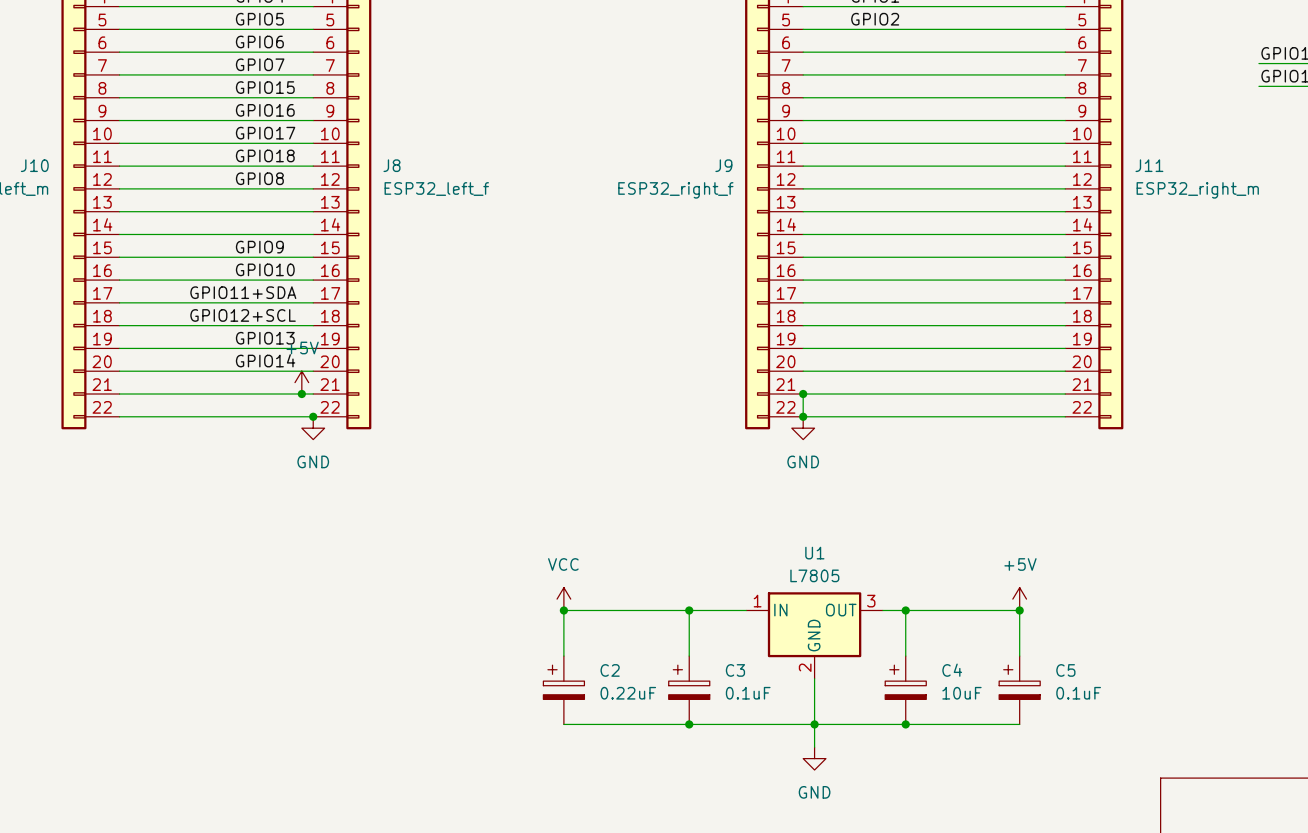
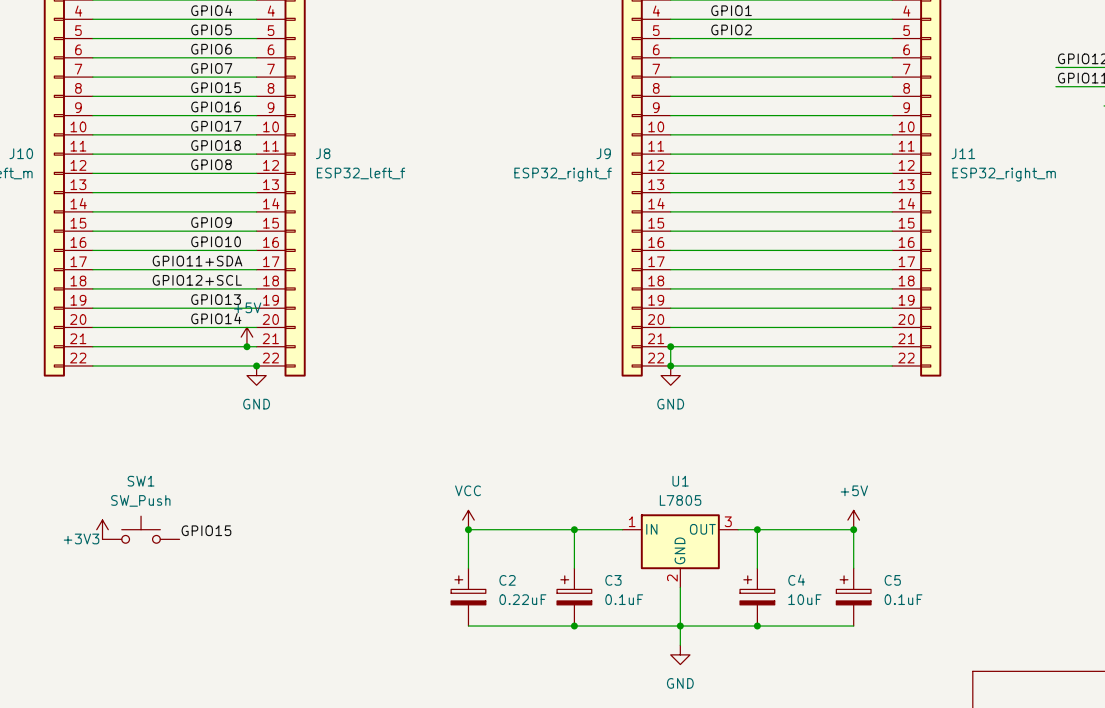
power symbol: none -> +3V3 (102, 529)
SW1: none -> SW_Push (141, 529)
label: none -> GPIO15 (206, 530)

